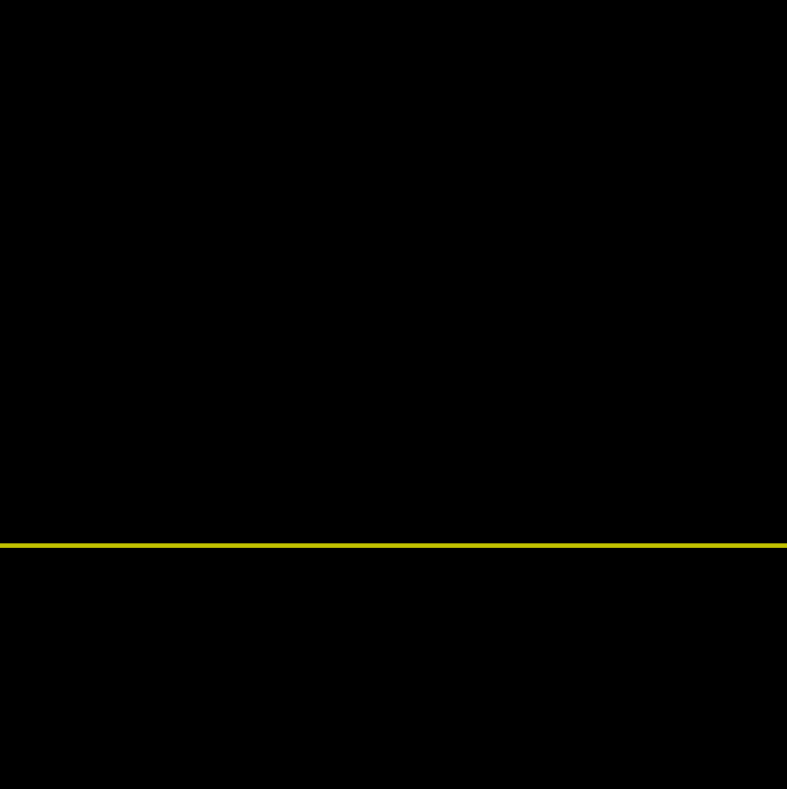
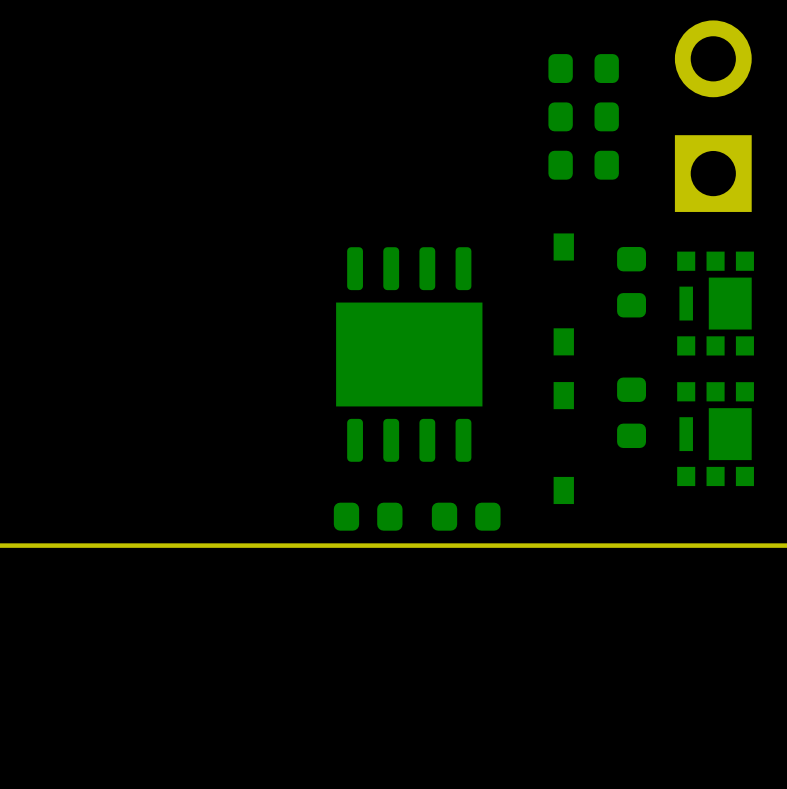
part: none -> (583, 68)
part: none -> (583, 116)
part: none -> (713, 116)
part: none -> (583, 165)
part: none -> (631, 282)
part: none -> (563, 294)
part: none -> (715, 303)
part: none -> (409, 354)
part: none -> (631, 412)
part: none -> (715, 434)
part: none -> (563, 443)
part: none -> (368, 516)
part: none -> (466, 516)

